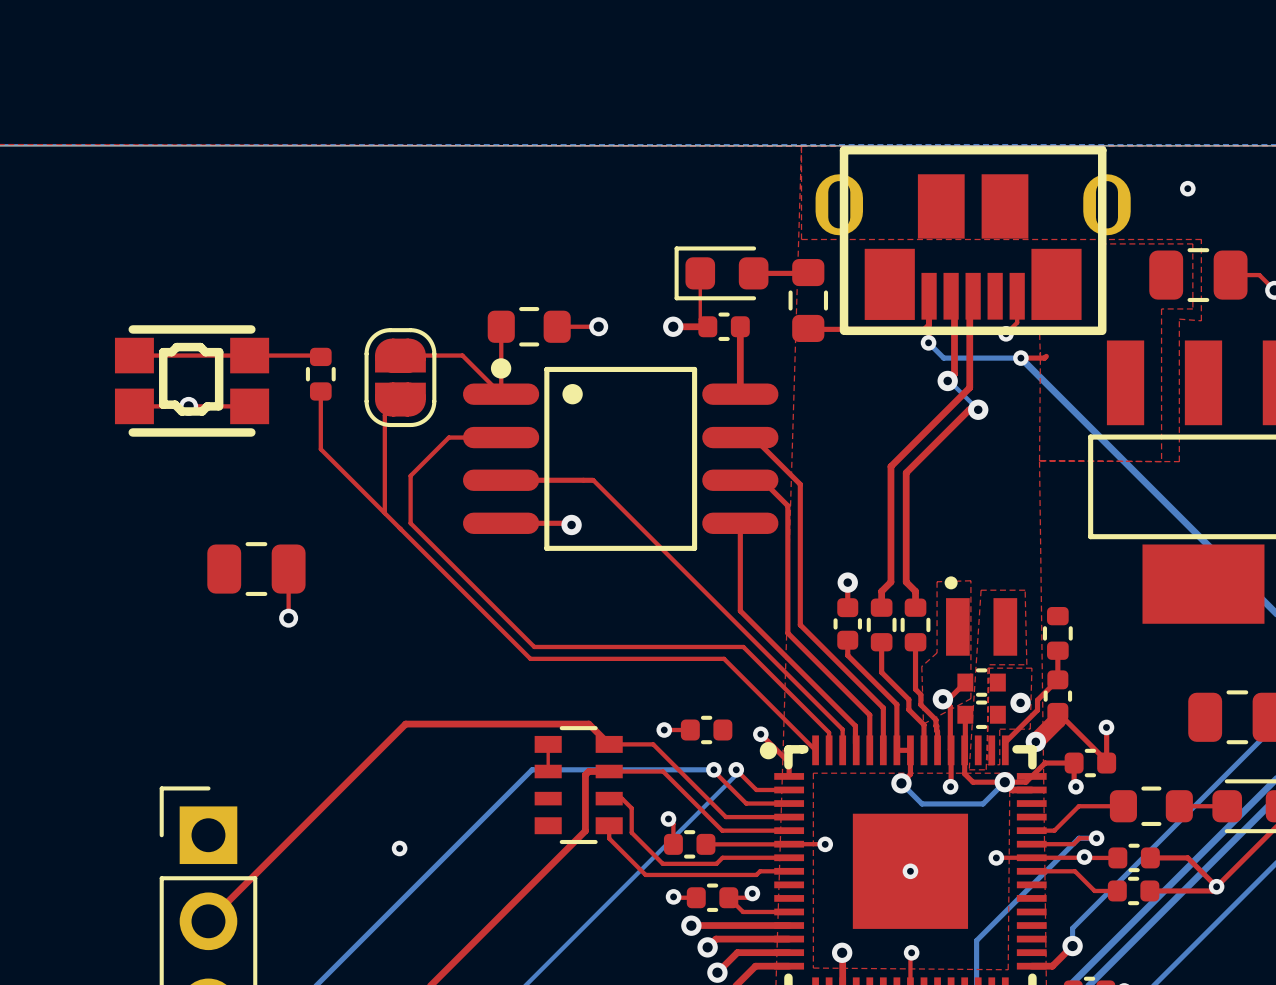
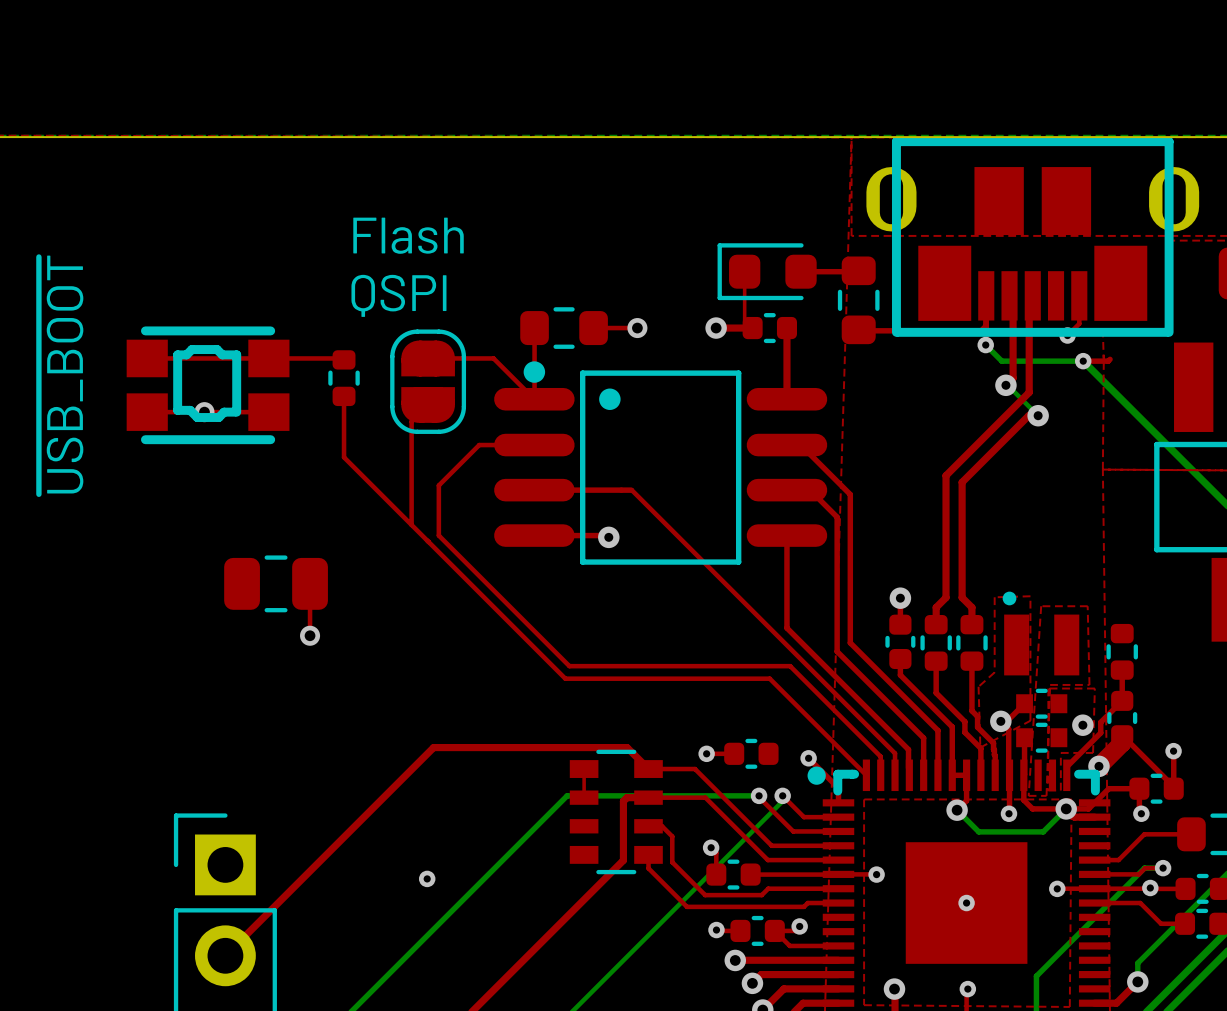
text: none -> Flash (408, 235)
text: none -> QSPI (398, 295)
text: none -> ~{USB_BOOT} (61, 374)

